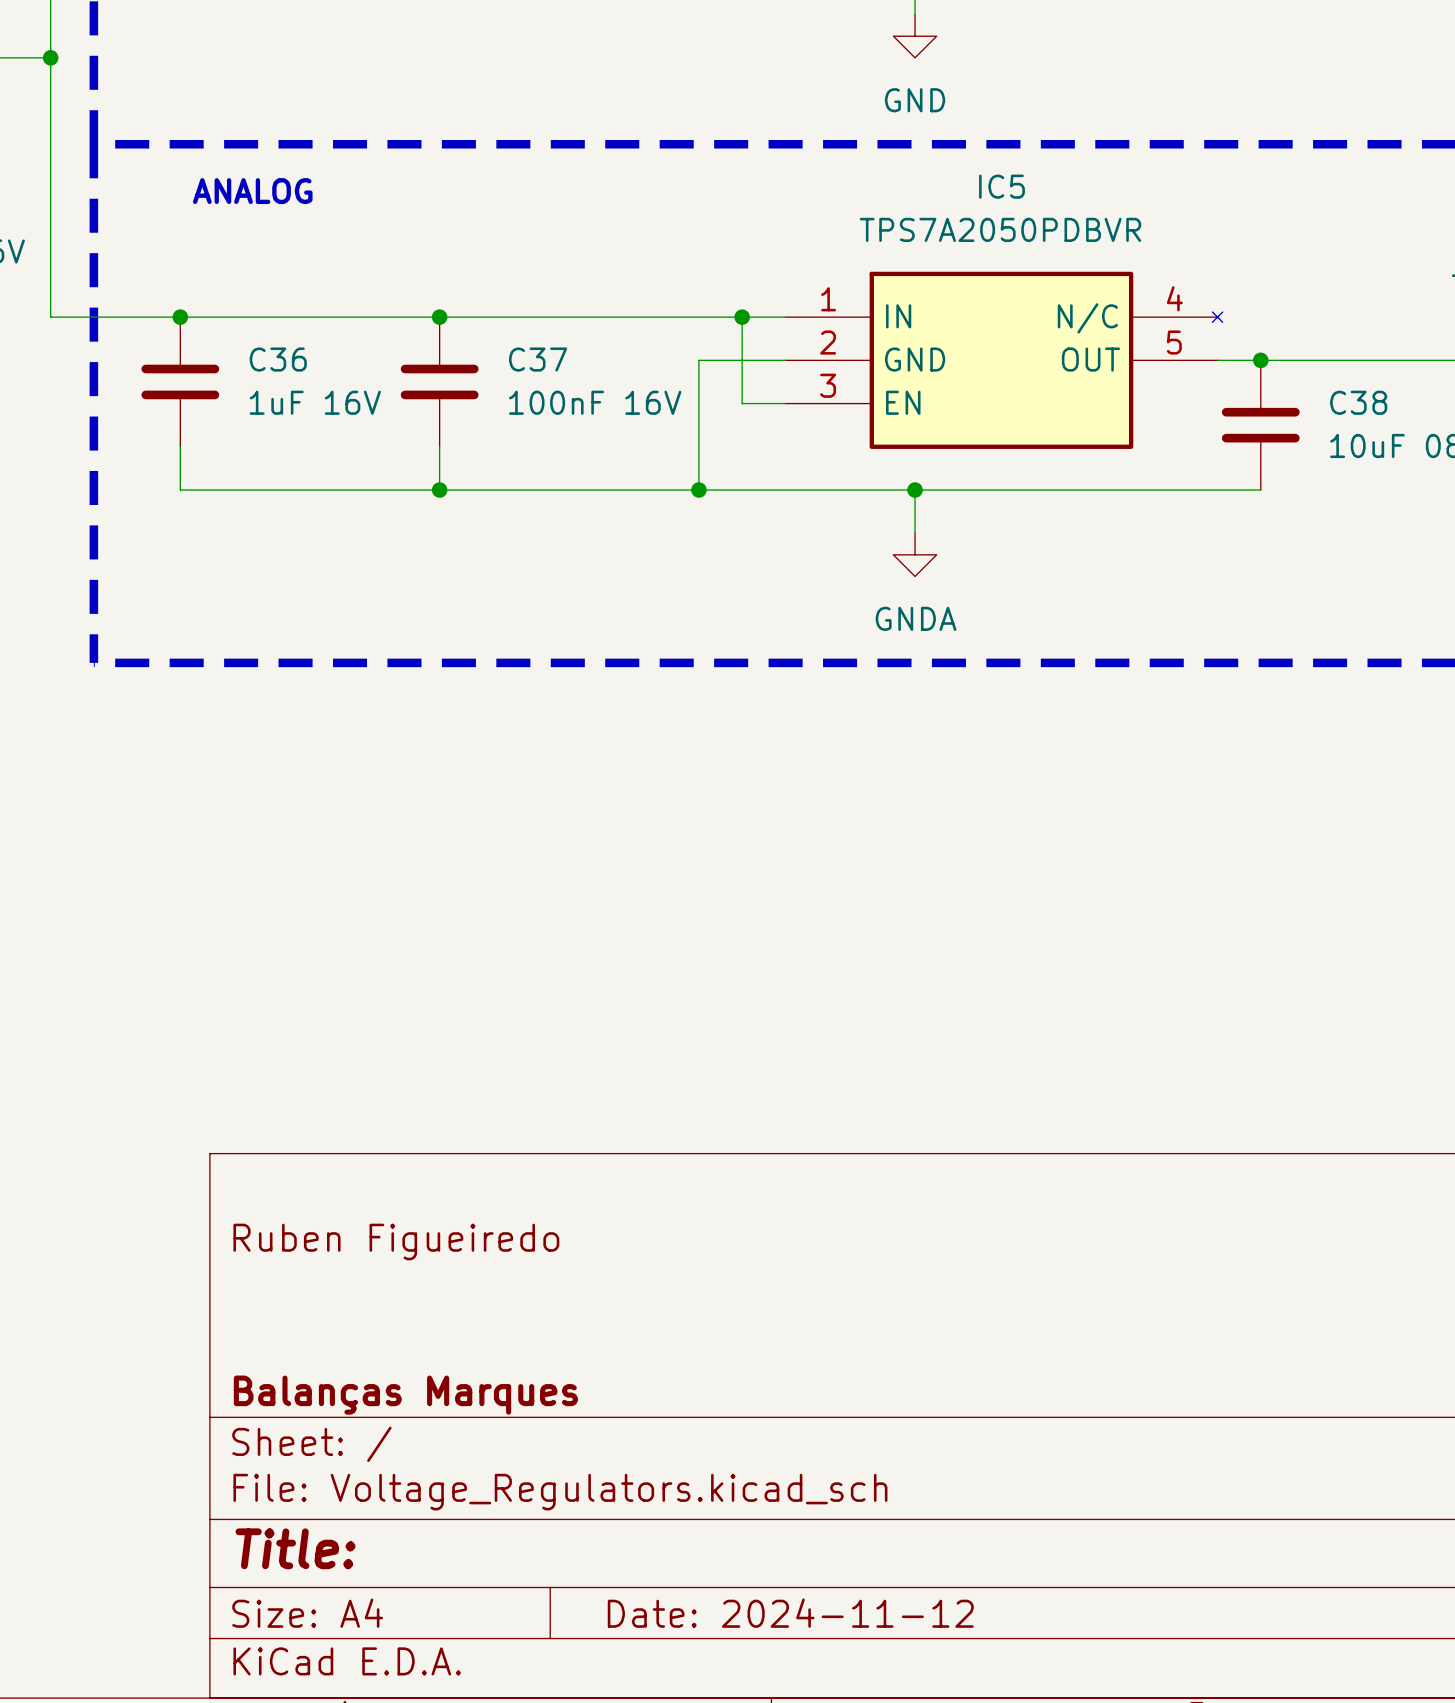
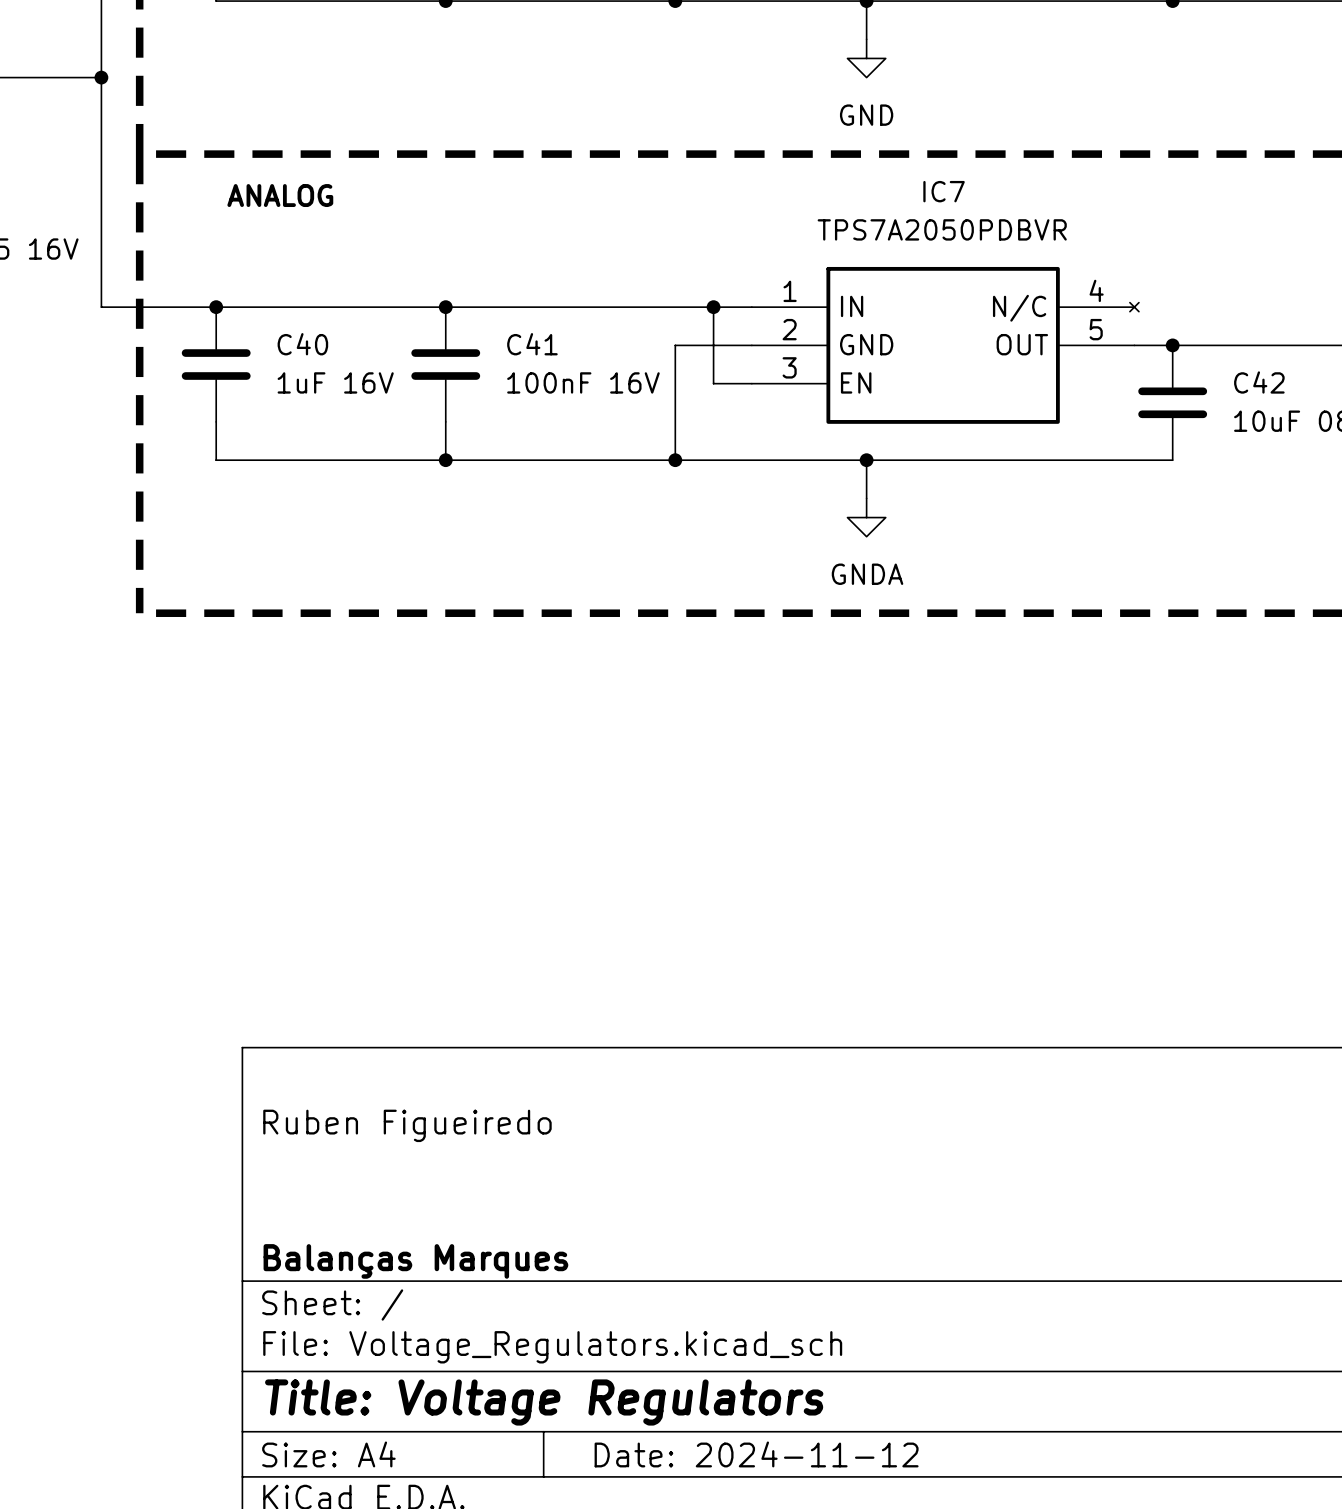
IC5 name: IC5 (1001, 186) -> IC7 (944, 191)
C36 name: C36 (278, 359) -> C40 (302, 344)
C37 name: C37 (538, 359) -> C41 (532, 344)
C38 name: C38 (1358, 402) -> C42 (1259, 382)
title block: Title: (295, 1548) -> Title: Voltage Regulators (544, 1402)

